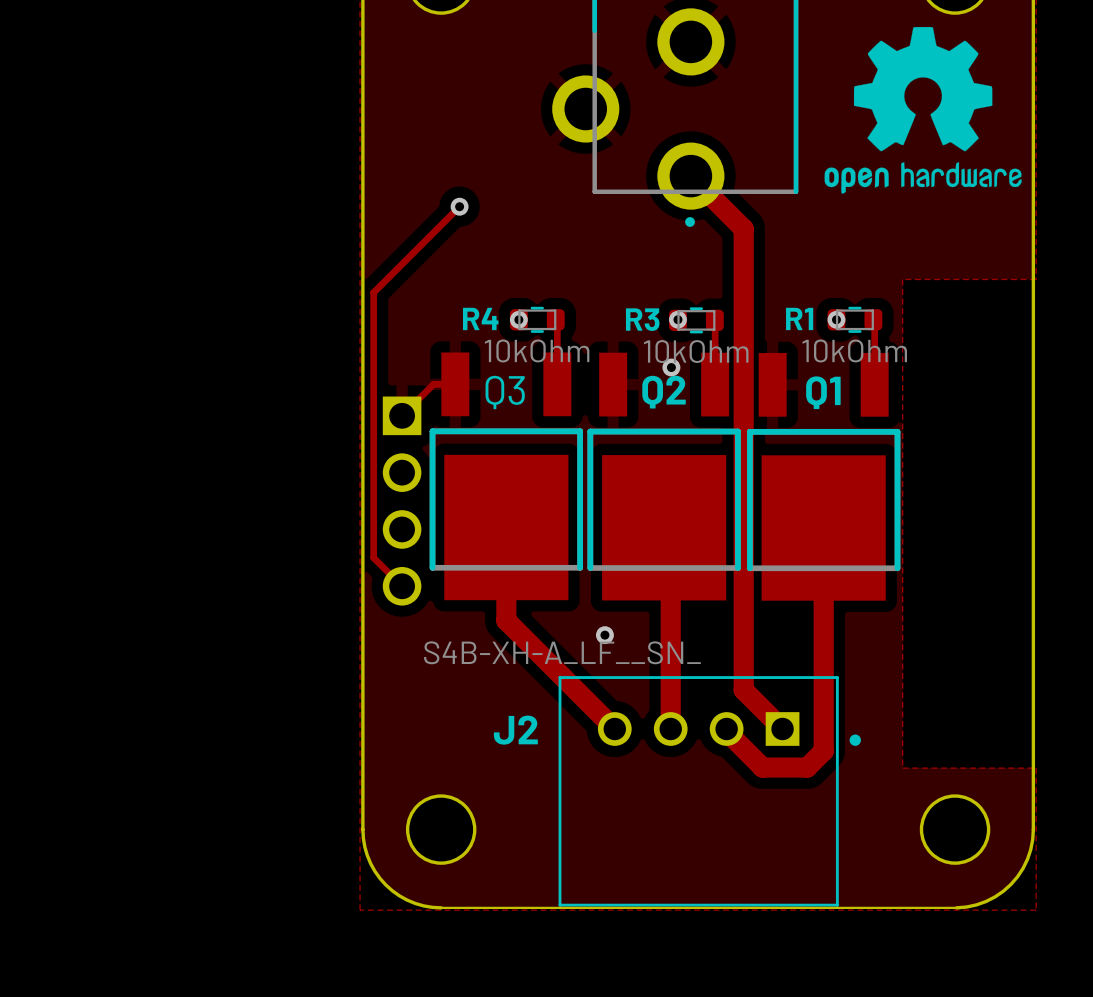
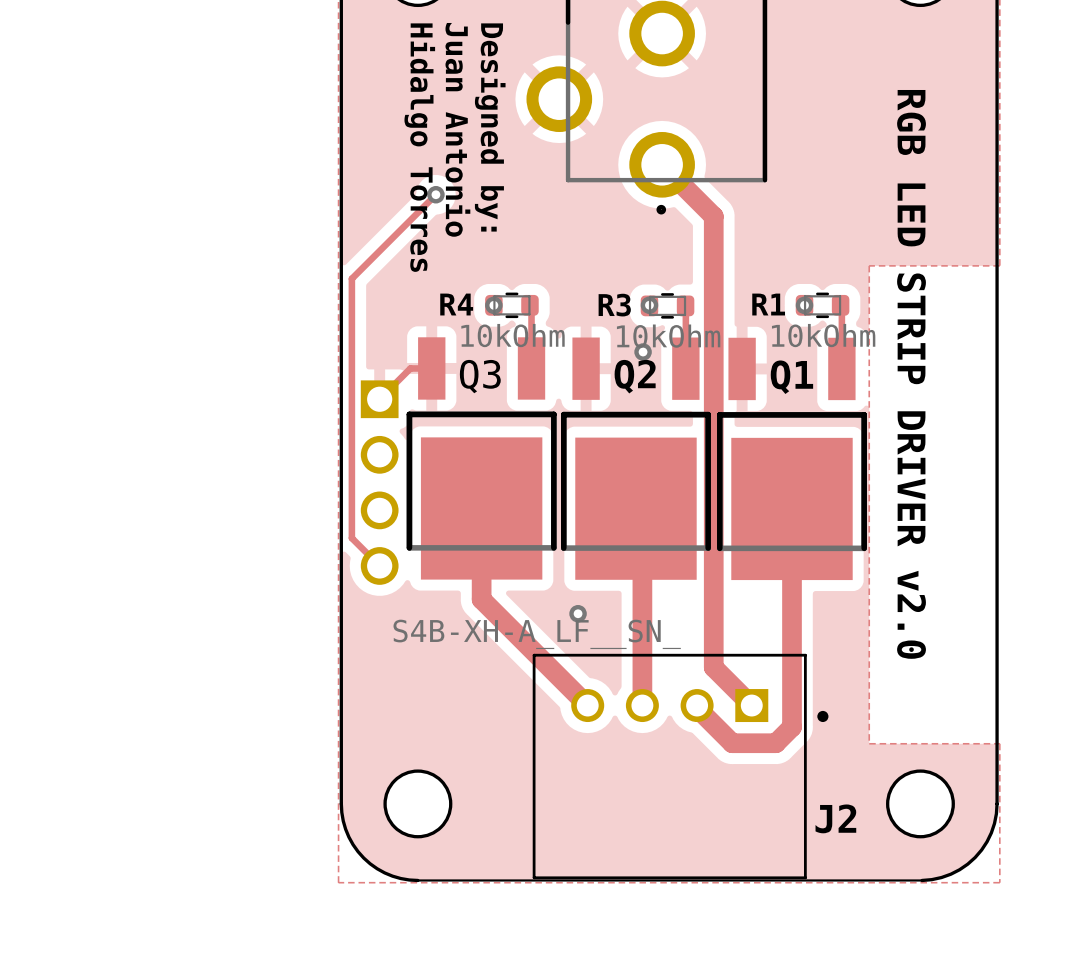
drawing: [824, 26, 1022, 194] -> none
text: none -> Designed by: (490, 127)
text: none -> Juan Antonio (457, 129)
text: none -> Hidalgo Torres (419, 147)
text: none -> RGB LED STRIP DRIVER v2.0 (911, 374)
J2 name position: J2 (515, 730) -> J2 (835, 818)

